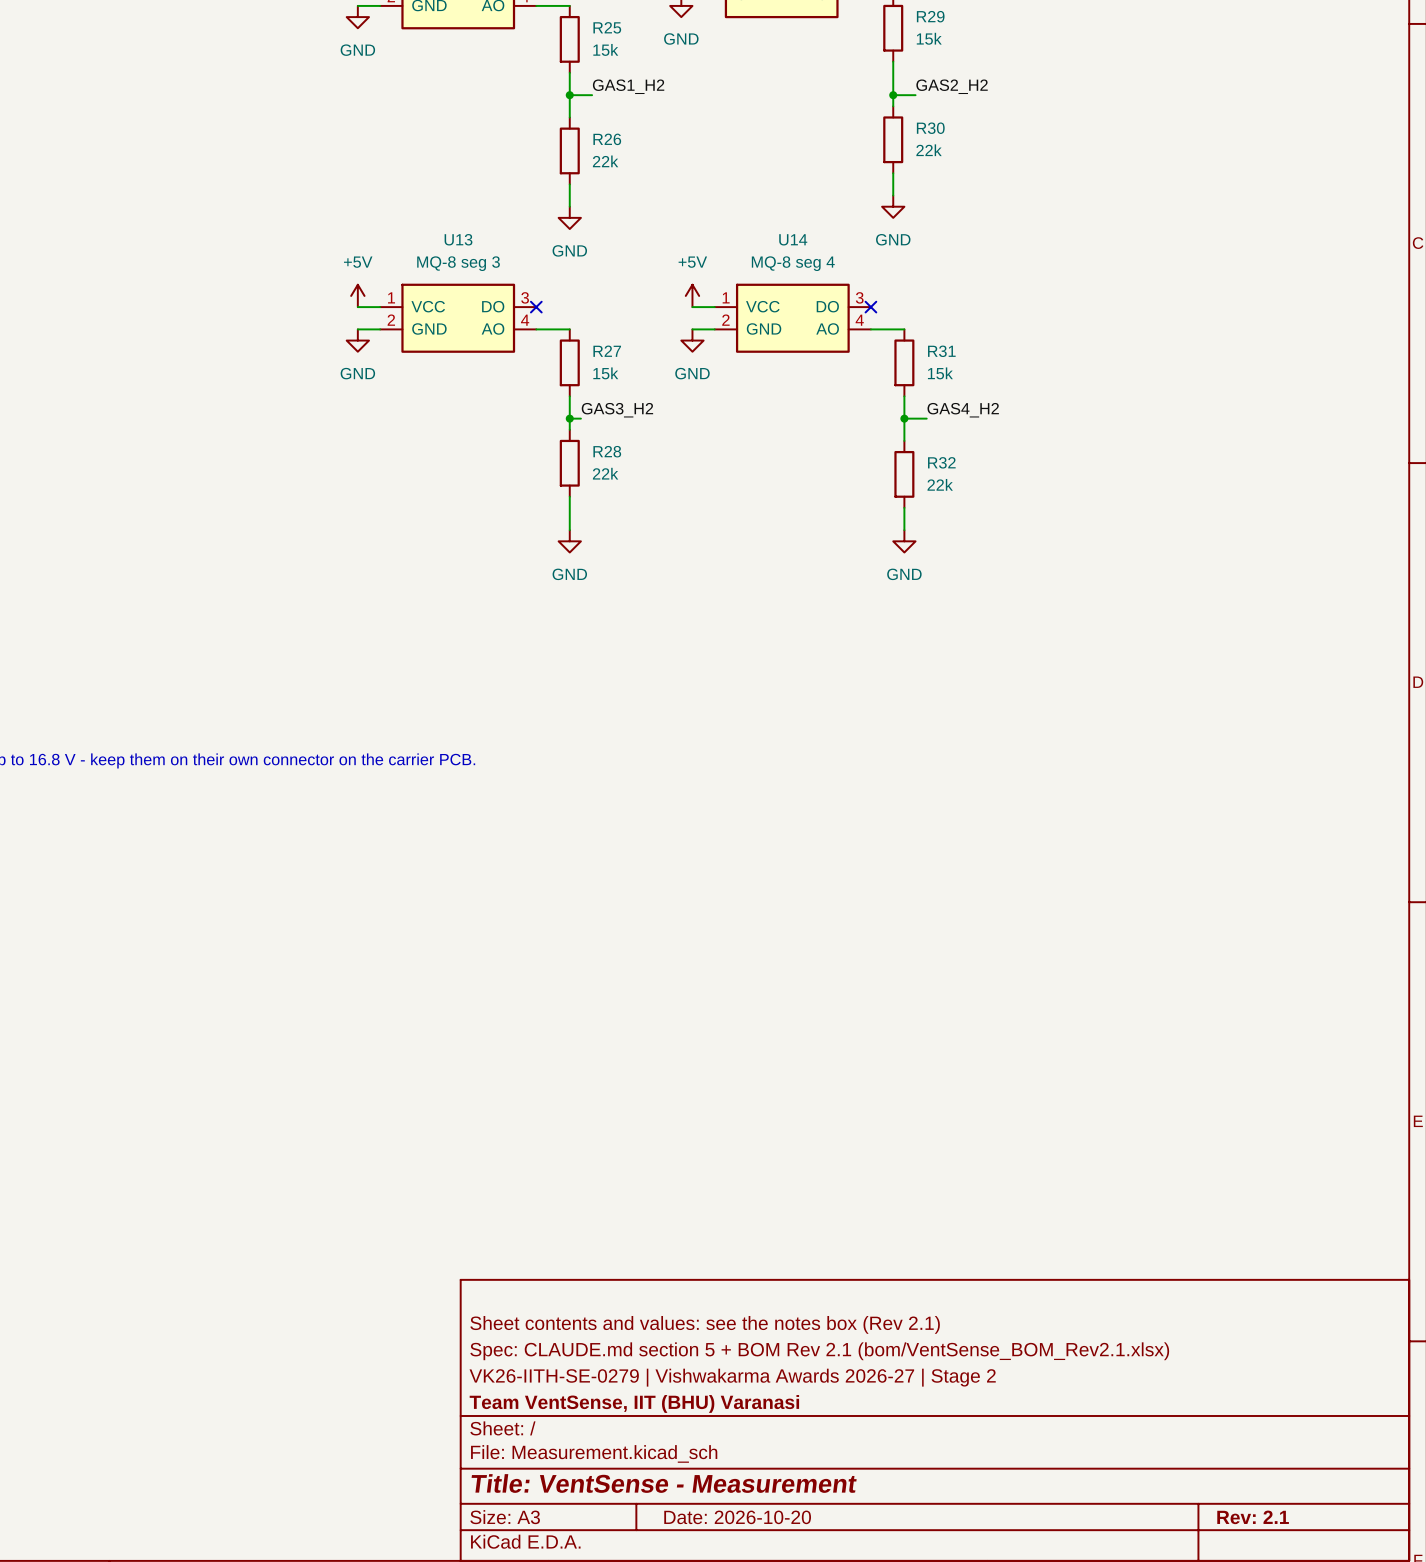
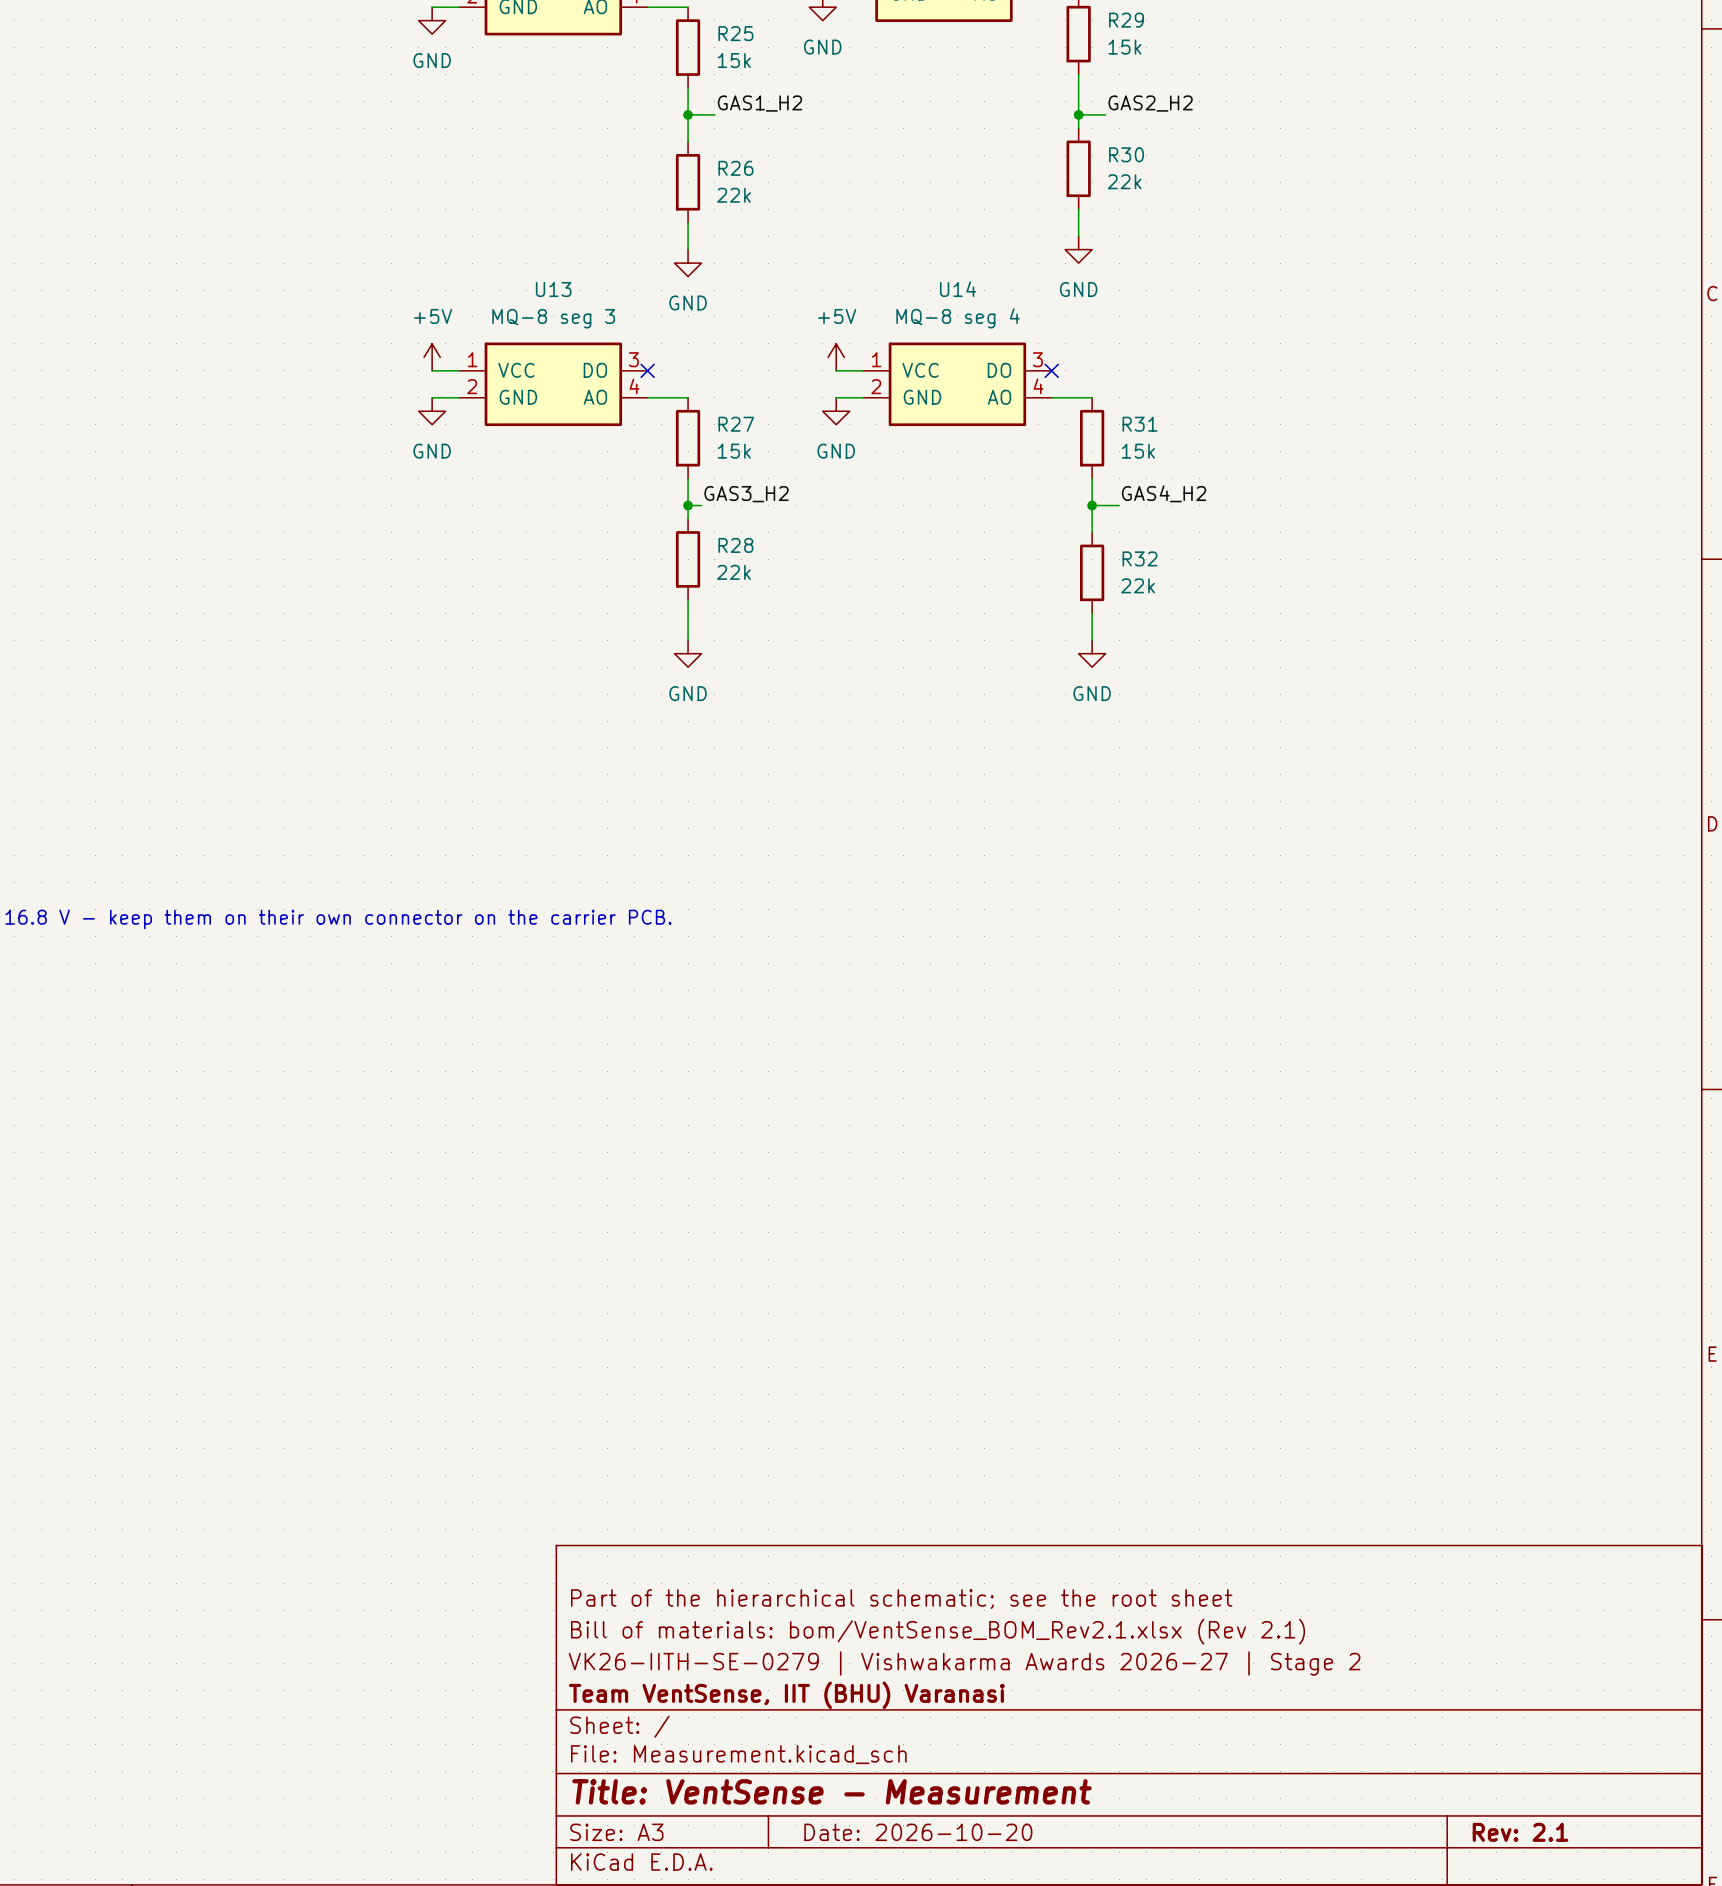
title block: Sheet contents and values: see the notes box (Rev 2.1) (705, 1324) -> Part of the hierarchical schematic; see the root sheet (901, 1599)
title block: Spec: CLAUDE.md section 5 + BOM Rev 2.1 (bom/VentSense_BOM_Rev2.1.xlsx) (819, 1351) -> Bill of materials: bom/VentSense_BOM_Rev2.1.xlsx (Rev 2.1) (938, 1631)

